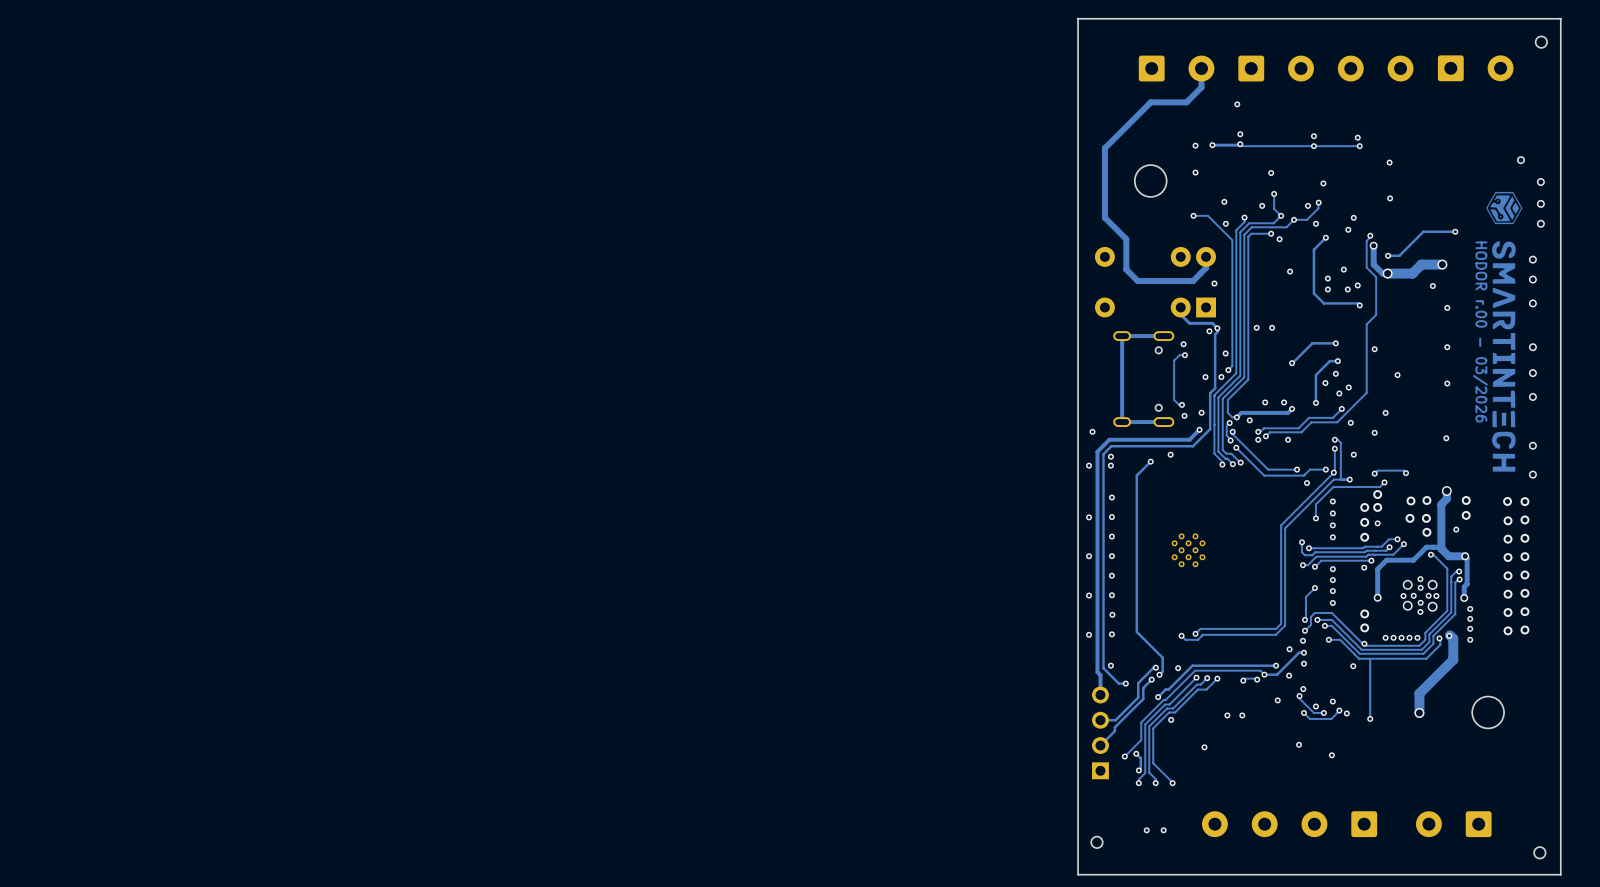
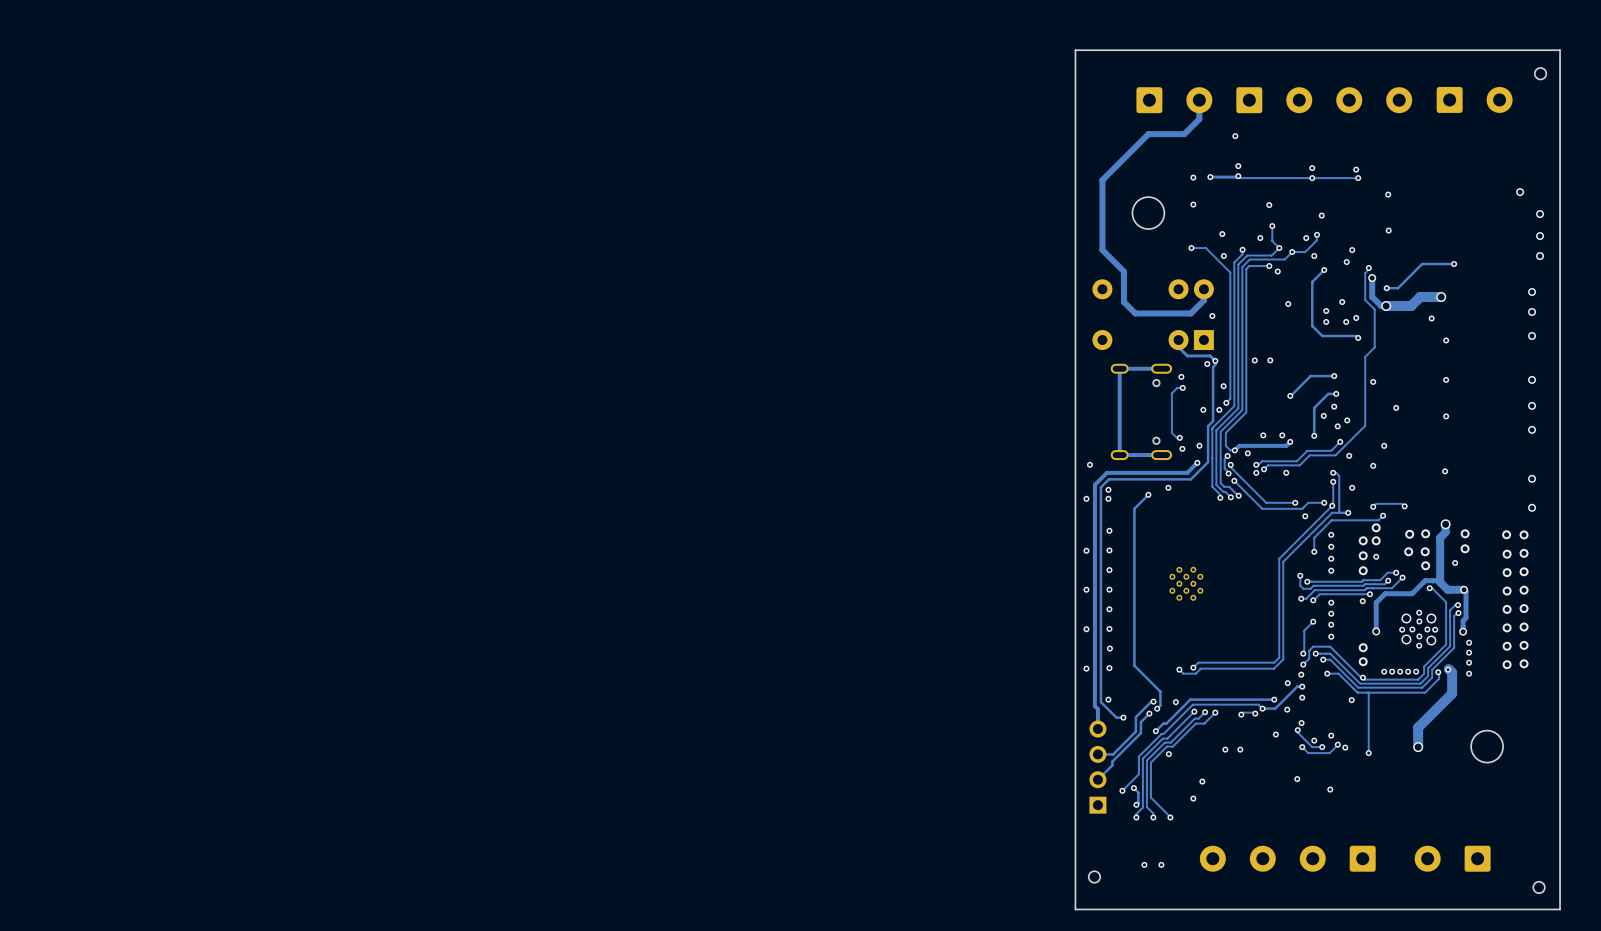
drawing: [1486, 191, 1523, 472] -> none
text: HODOR r.00 - 03/2026 (1480, 331) -> none
via: none -> (1193, 798)

